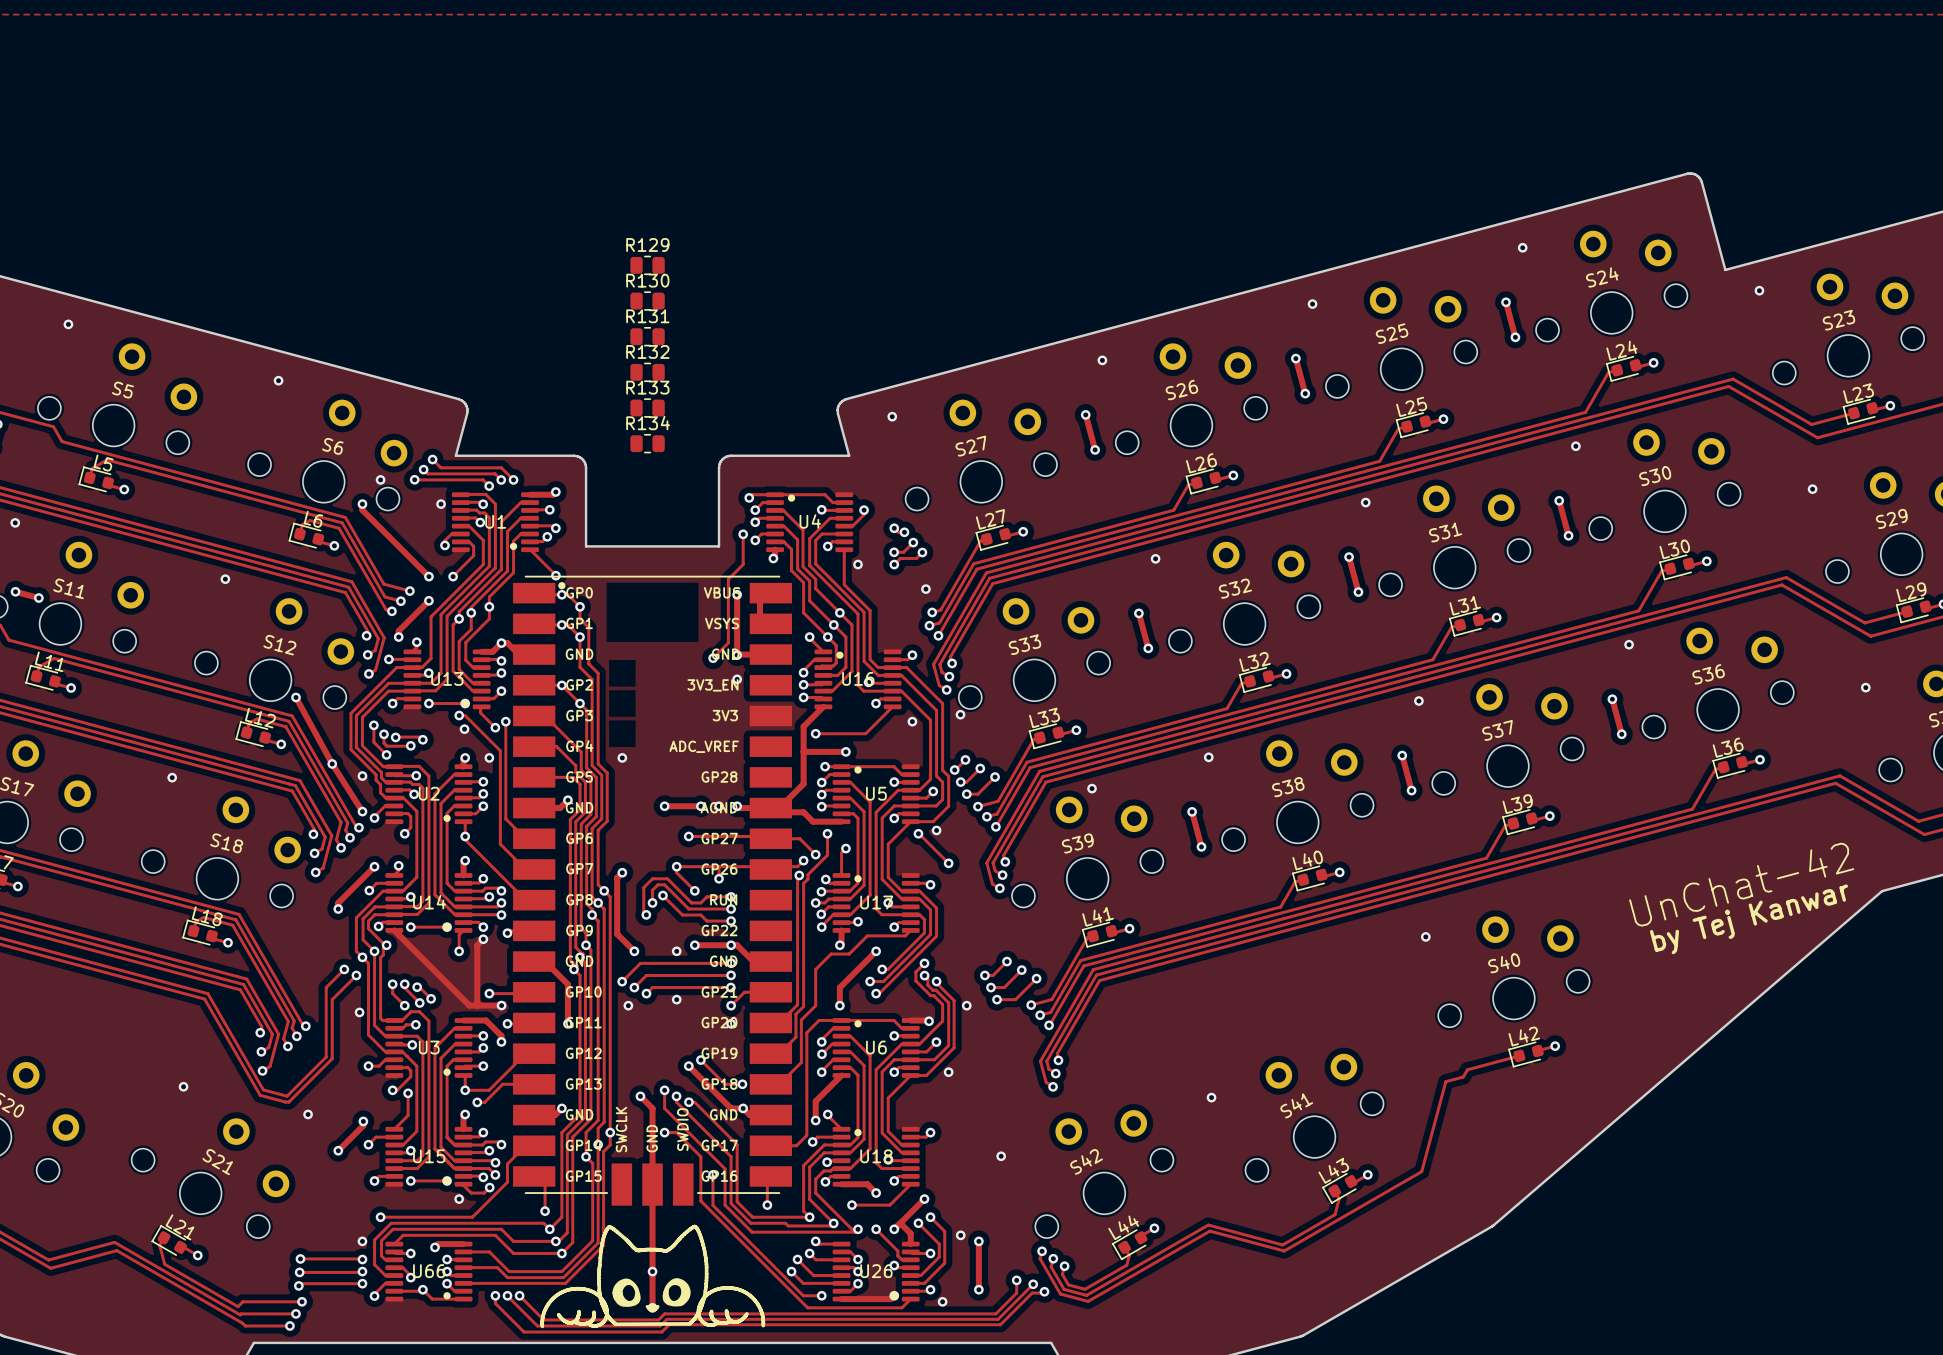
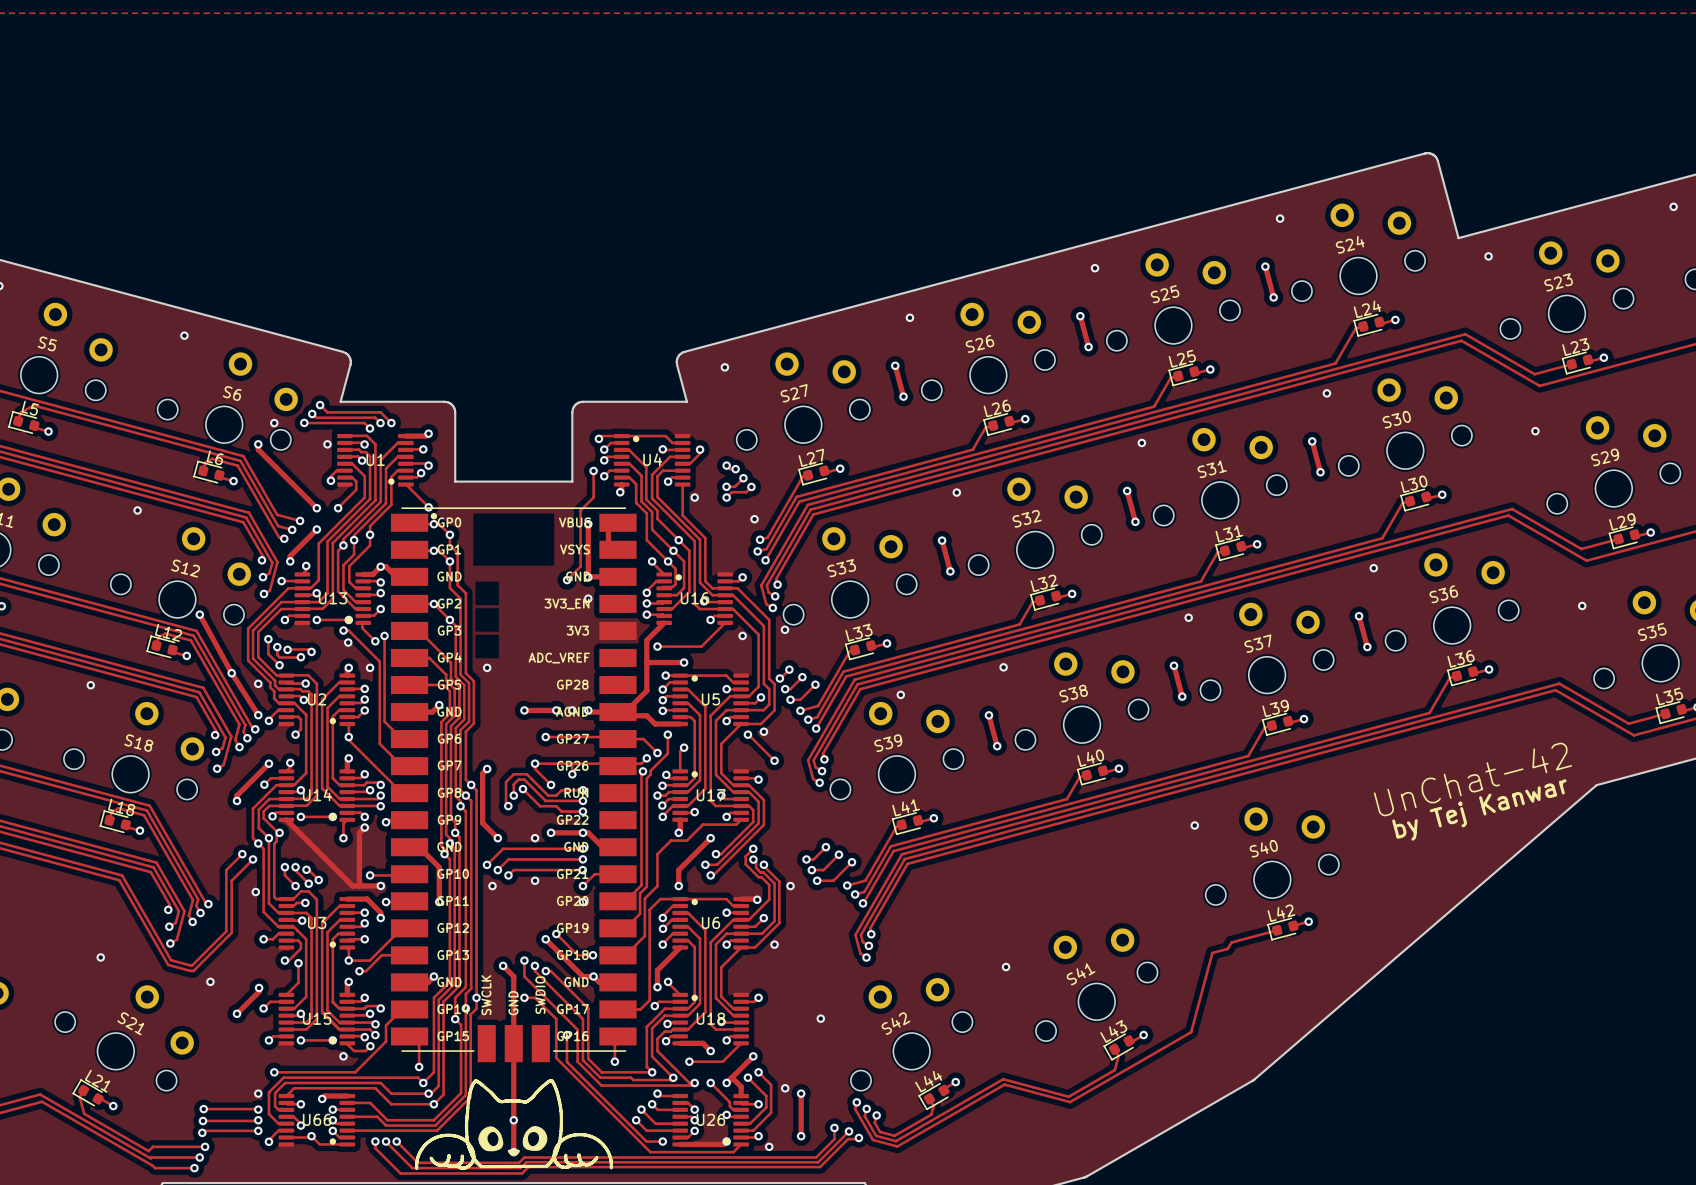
R129: (647, 265) -> none
R130: (647, 301) -> none
R131: (647, 336) -> none
R132: (647, 372) -> none
R133: (647, 408) -> none
R134: (647, 443) -> none

